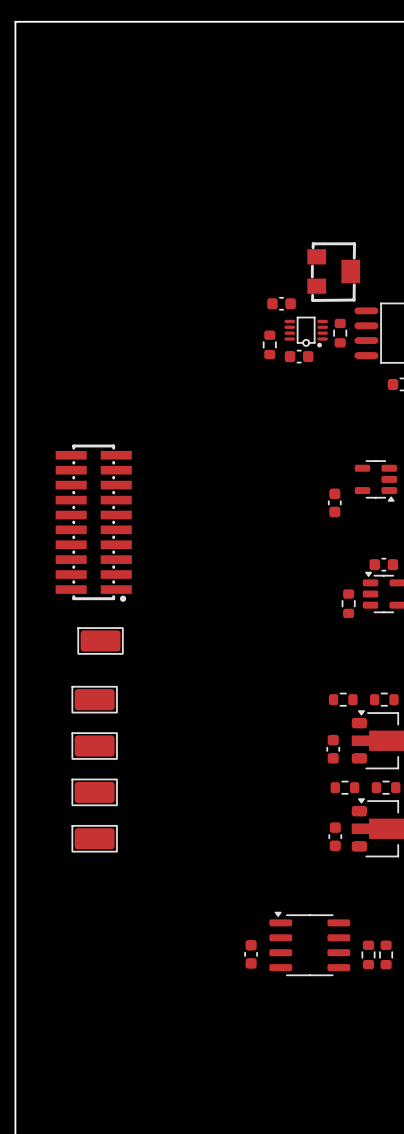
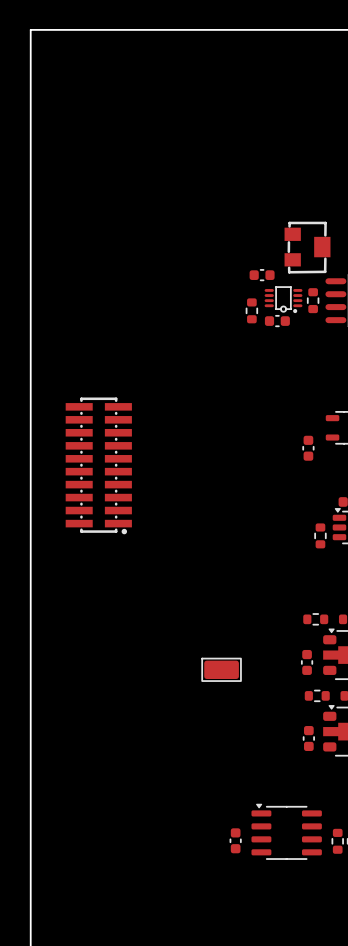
part: (100, 640) -> none
part: (94, 699) -> none
part: (94, 746) -> none
part: none -> (221, 669)
part: (94, 792) -> none
part: (94, 838) -> none

